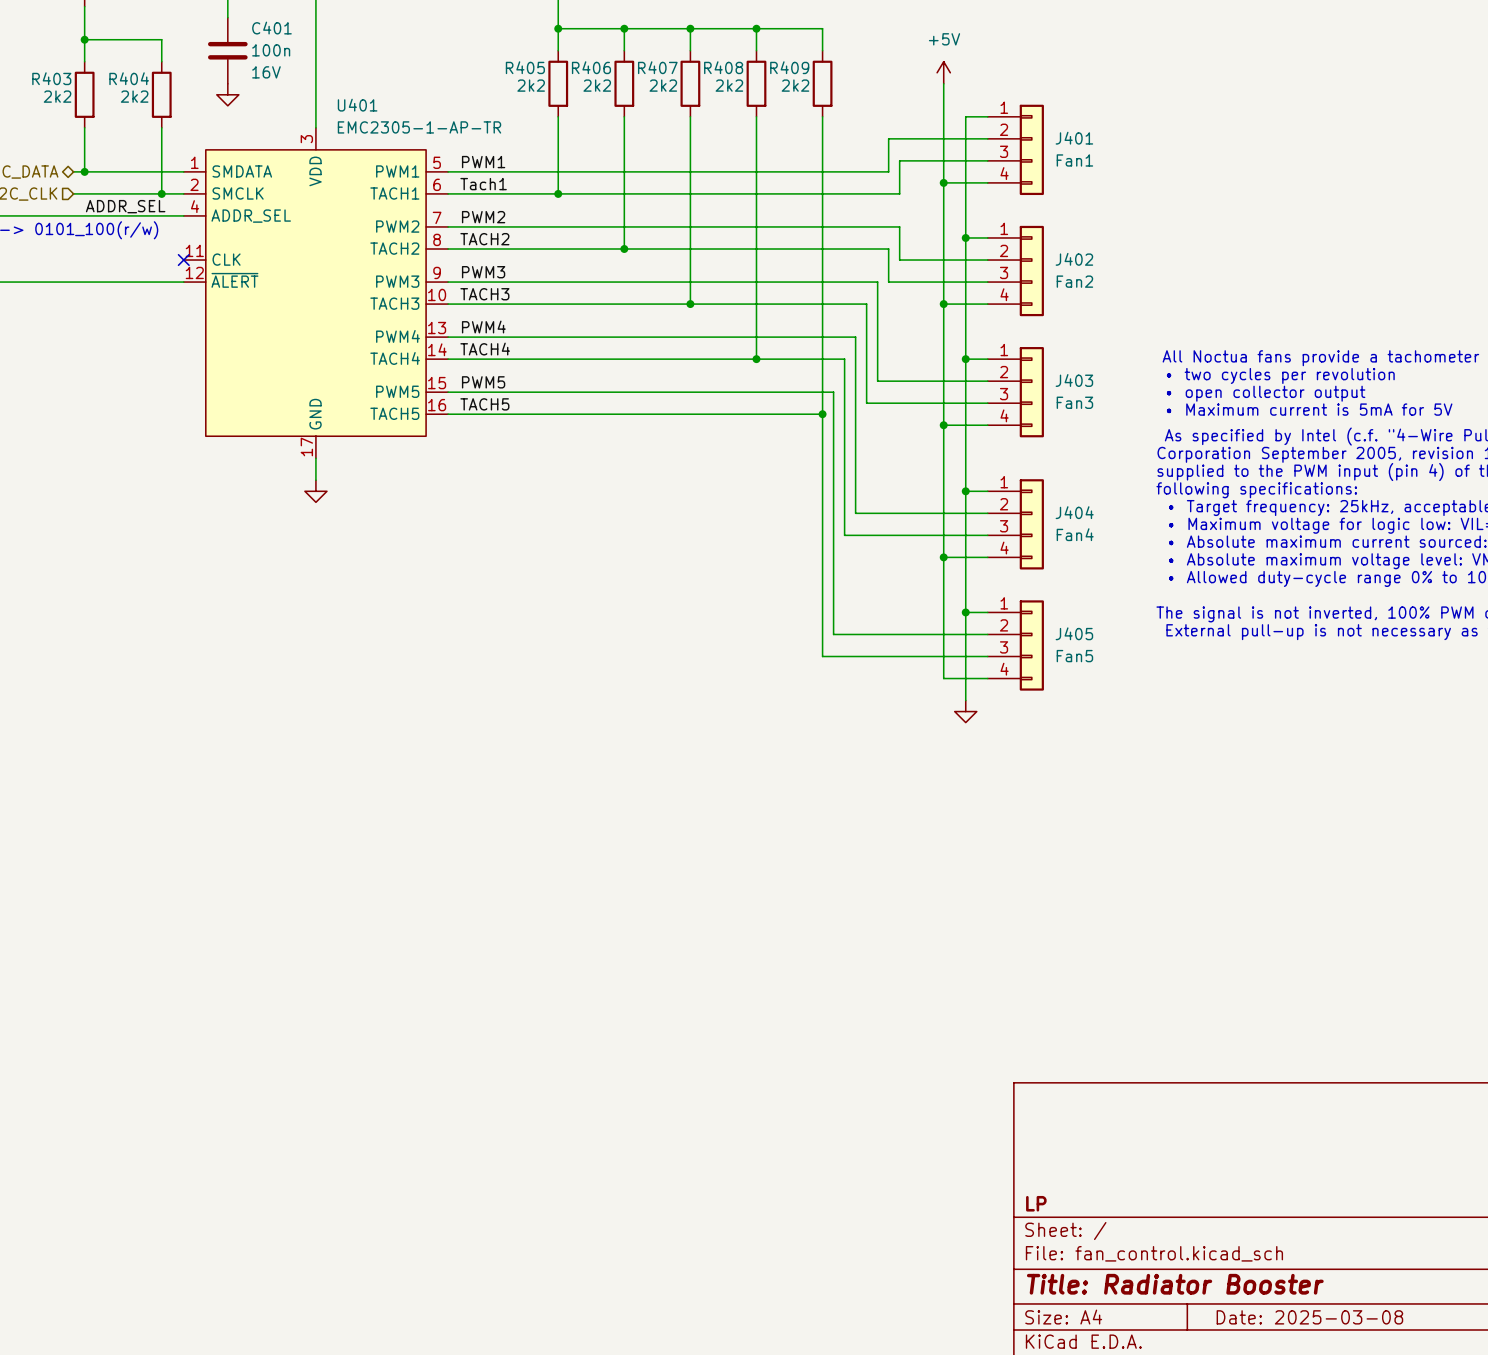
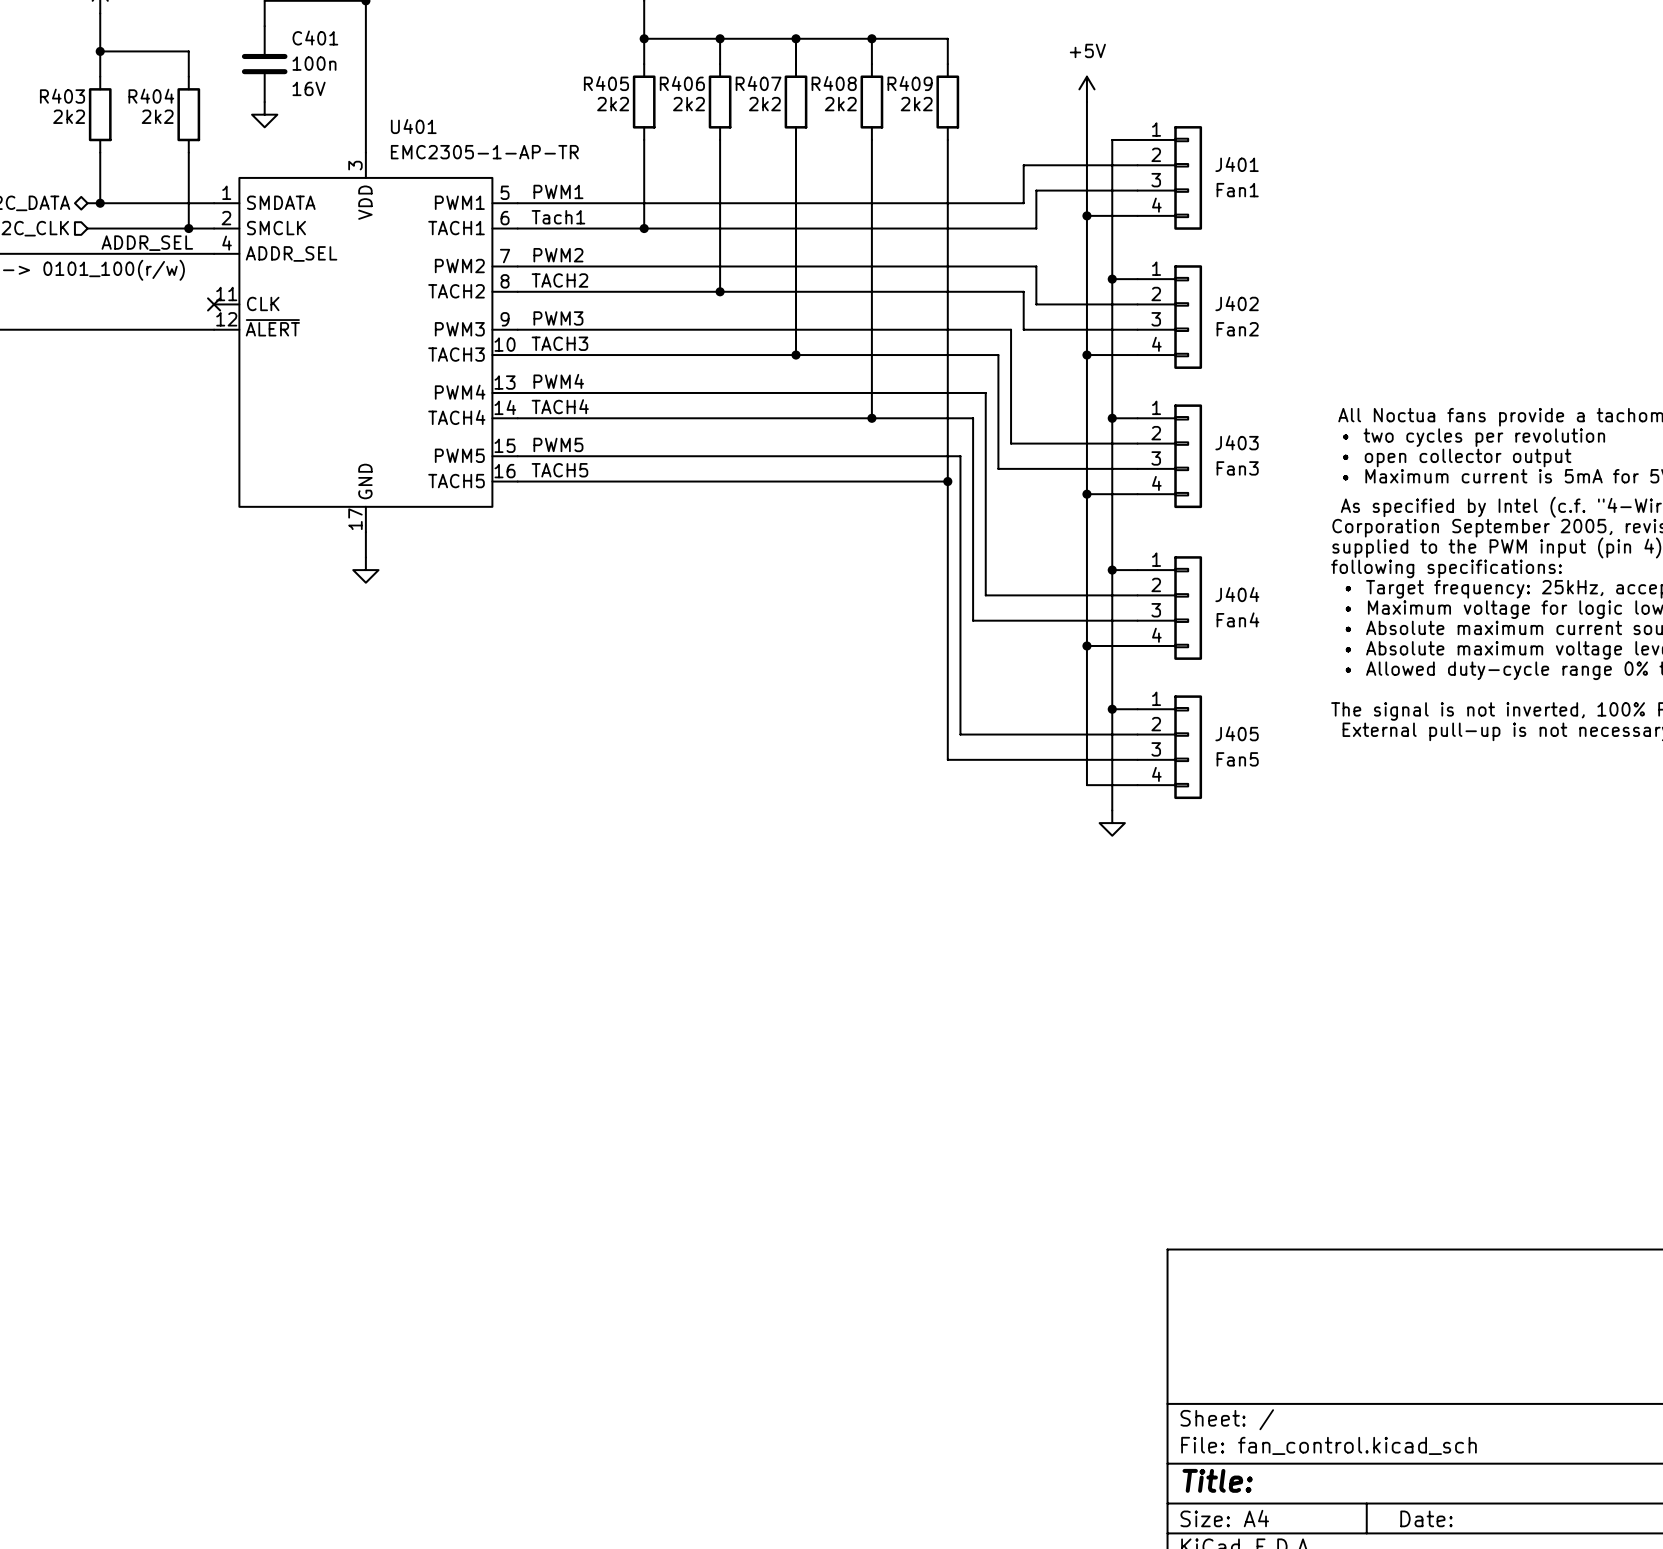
title block: LP (1036, 1203) -> none
title block: Title: Radiator Booster (1175, 1284) -> Title: (1217, 1480)
title block: Date: 2025-03-08 (1309, 1317) -> Date: (1426, 1518)

